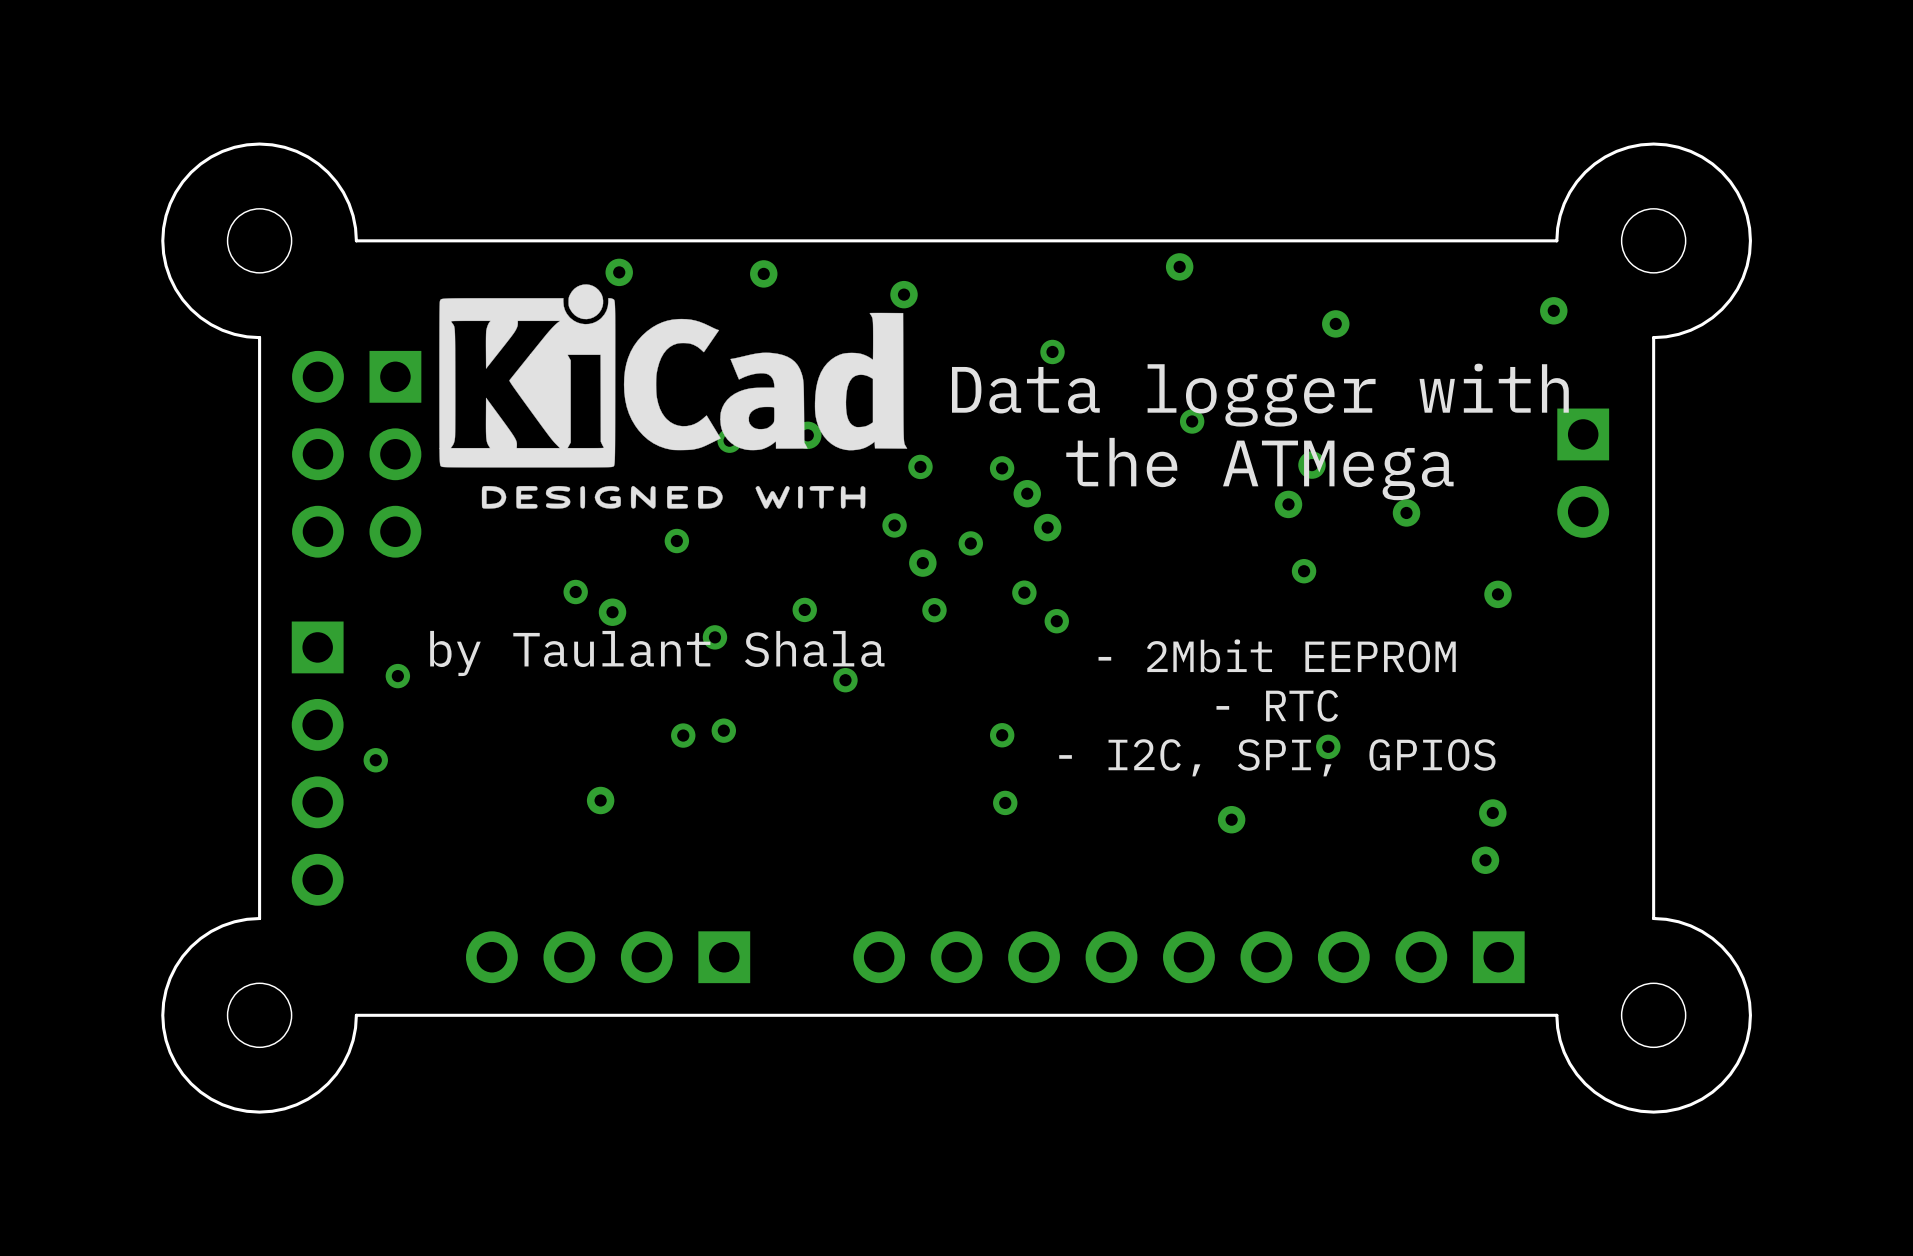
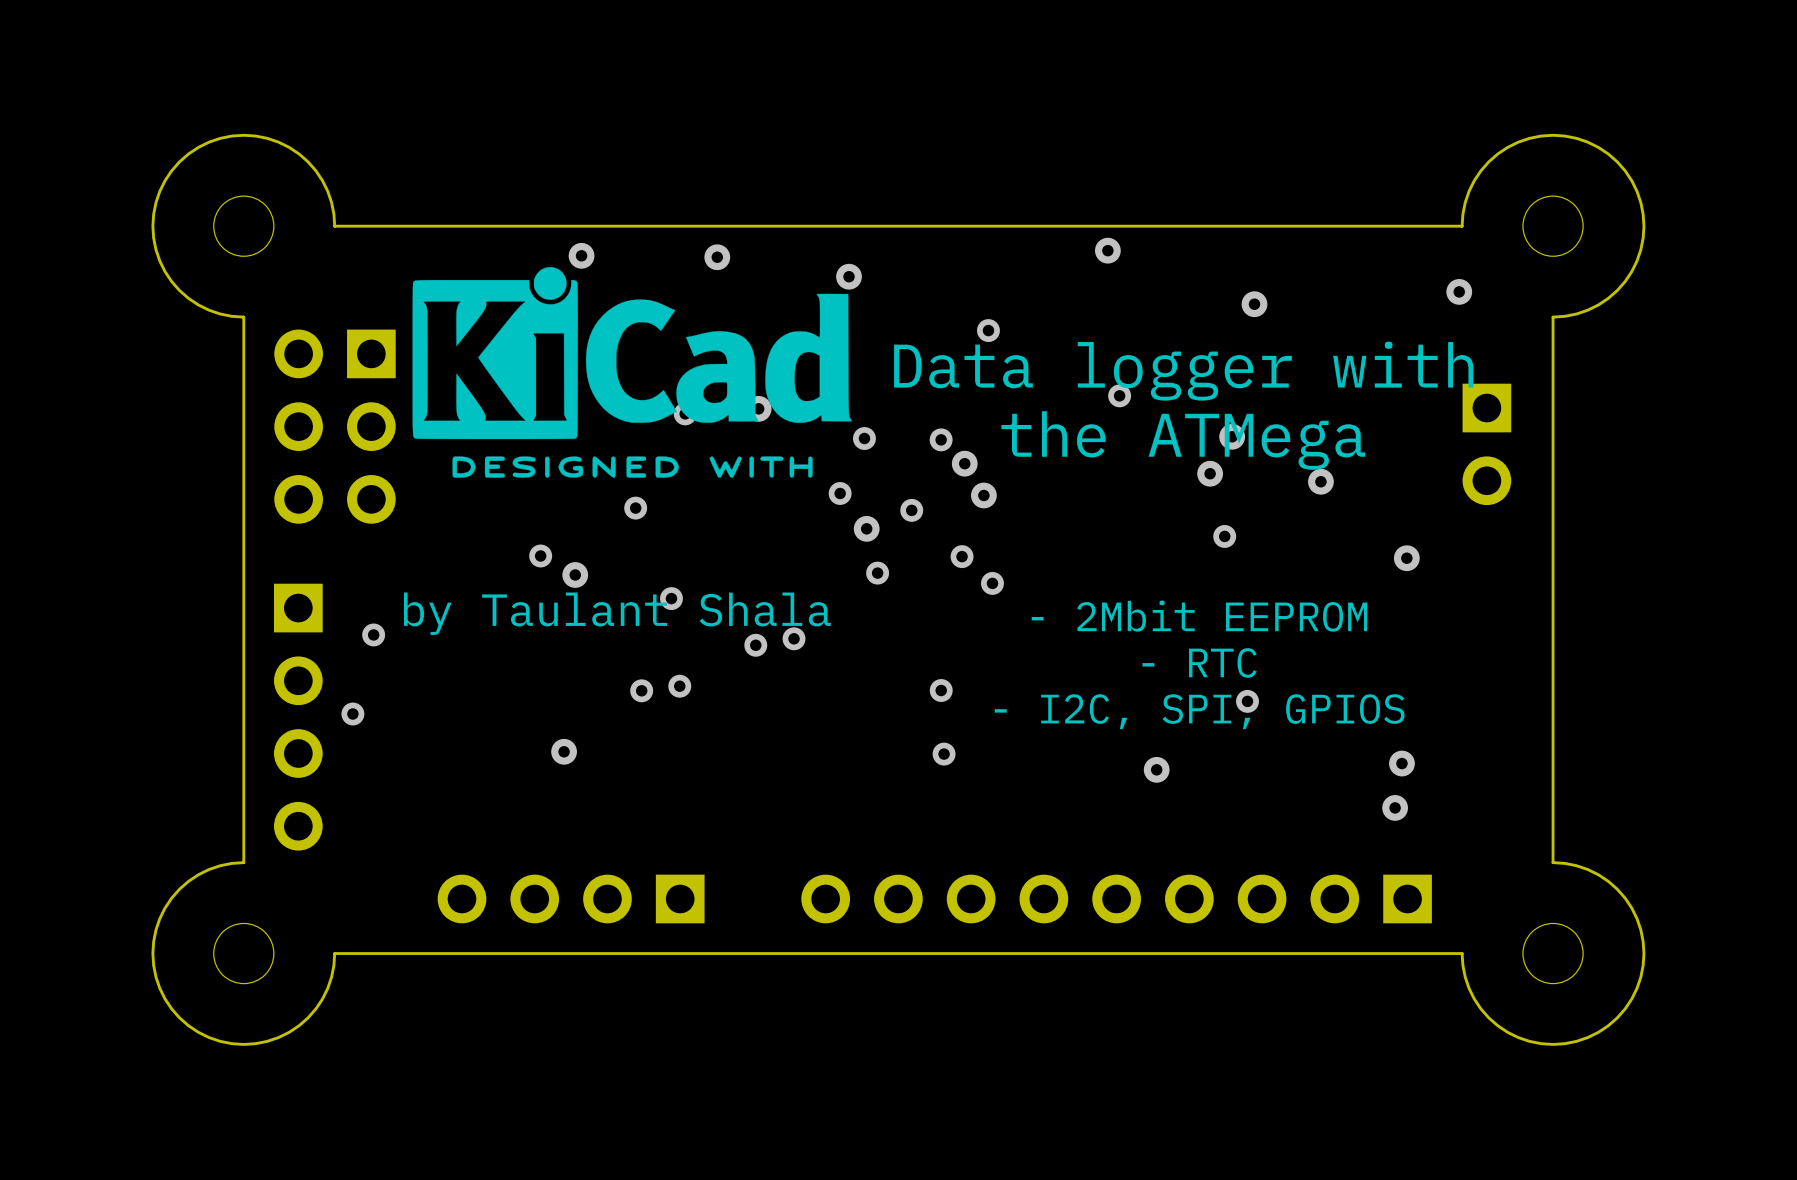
via position: (804, 609) -> (755, 645)

